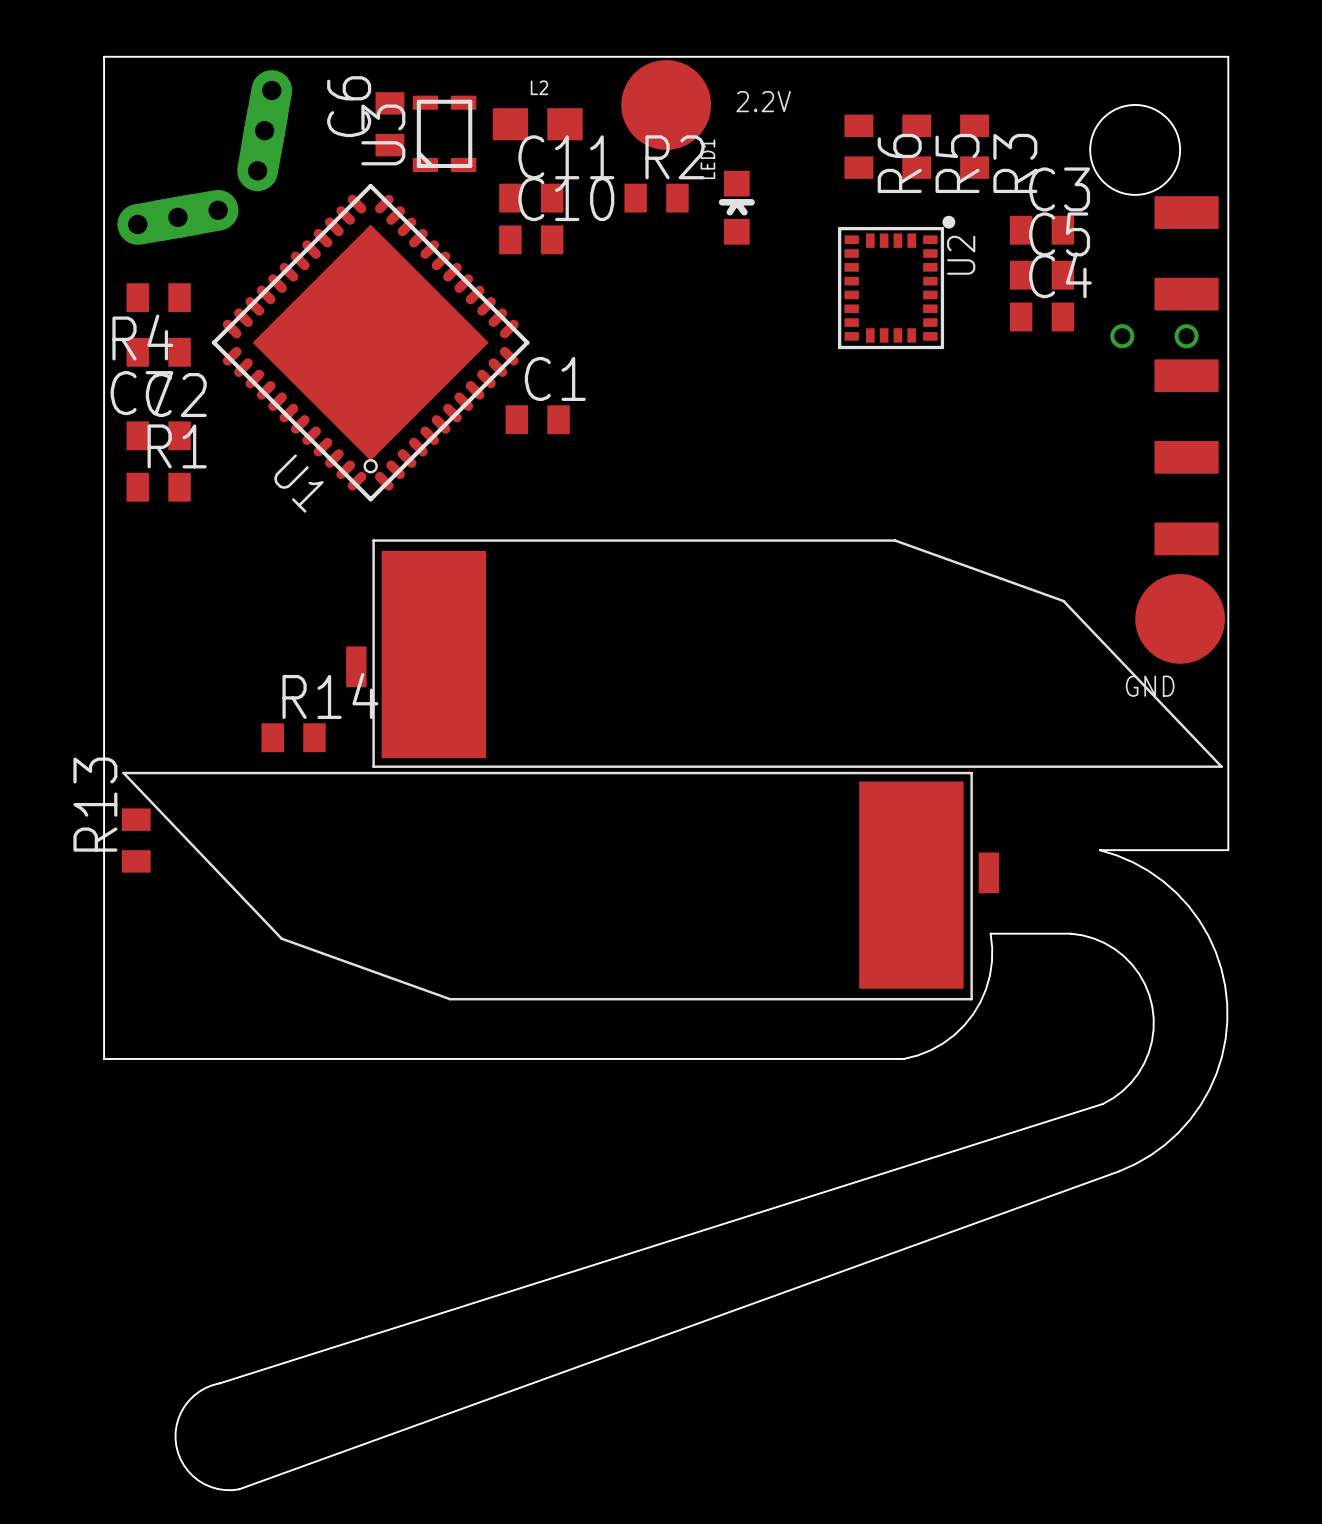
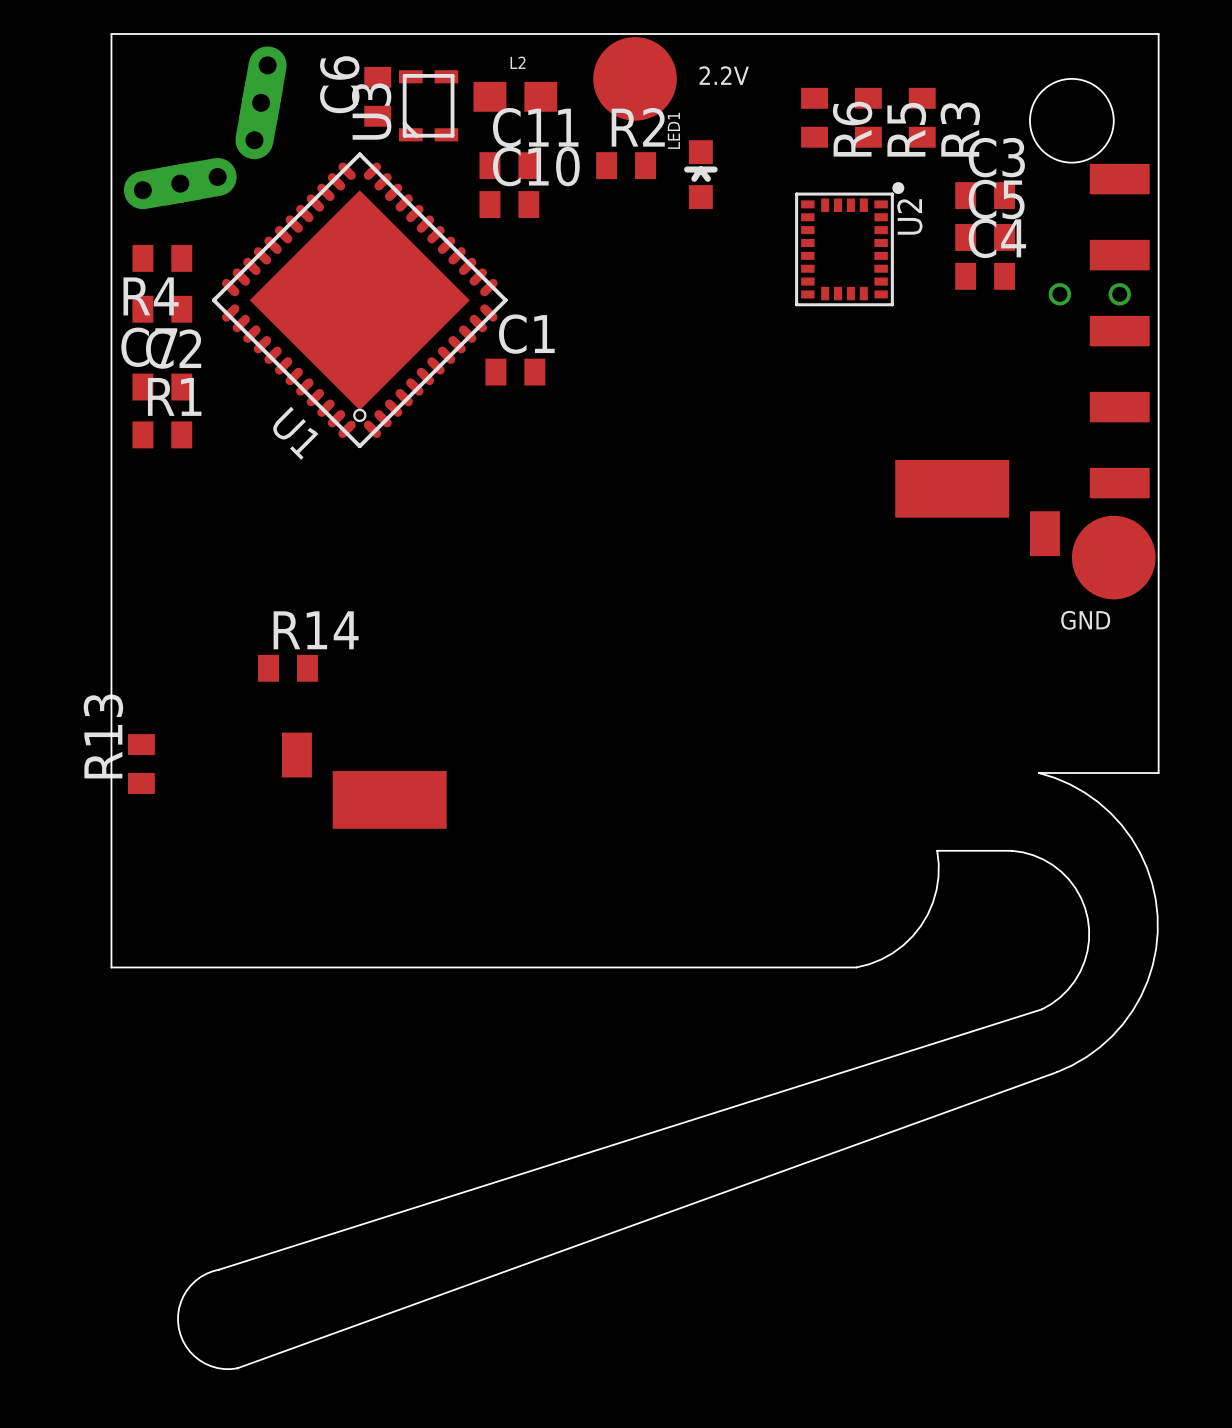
part: none -> (977, 507)
part: (784, 653) -> none
part: none -> (364, 780)
part: (560, 886) -> none

